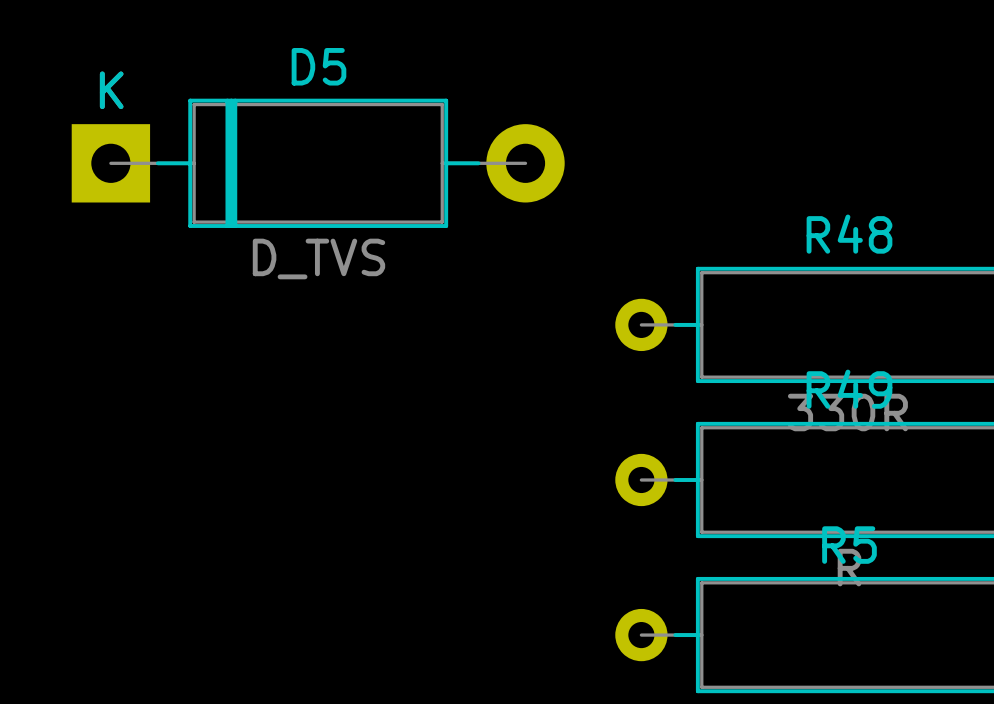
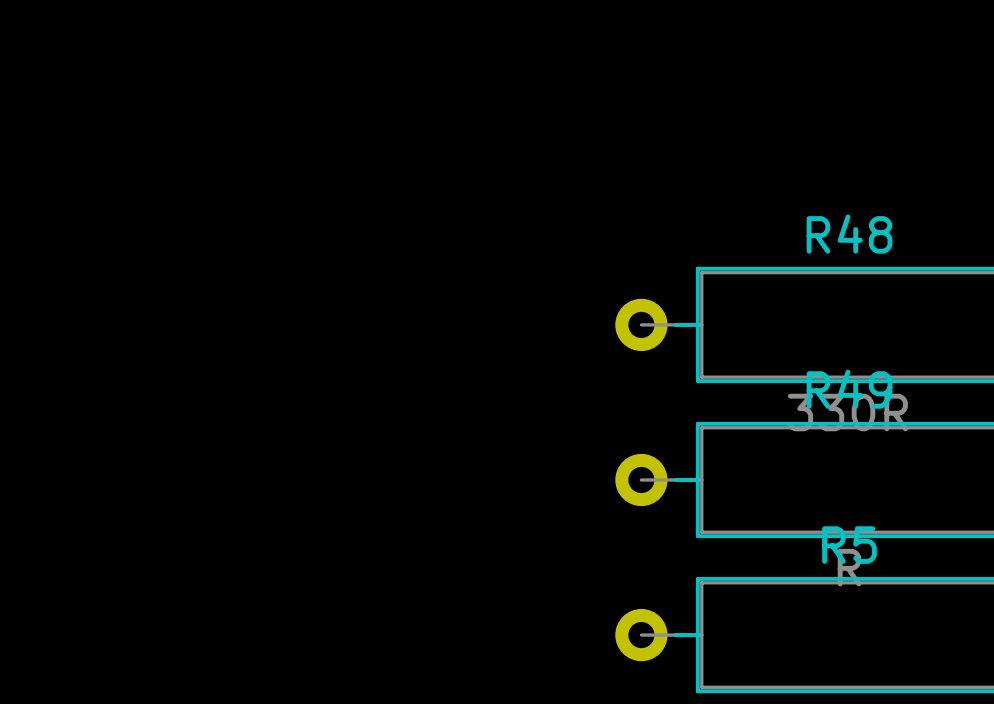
D5: D_TVS (318, 163) -> none

